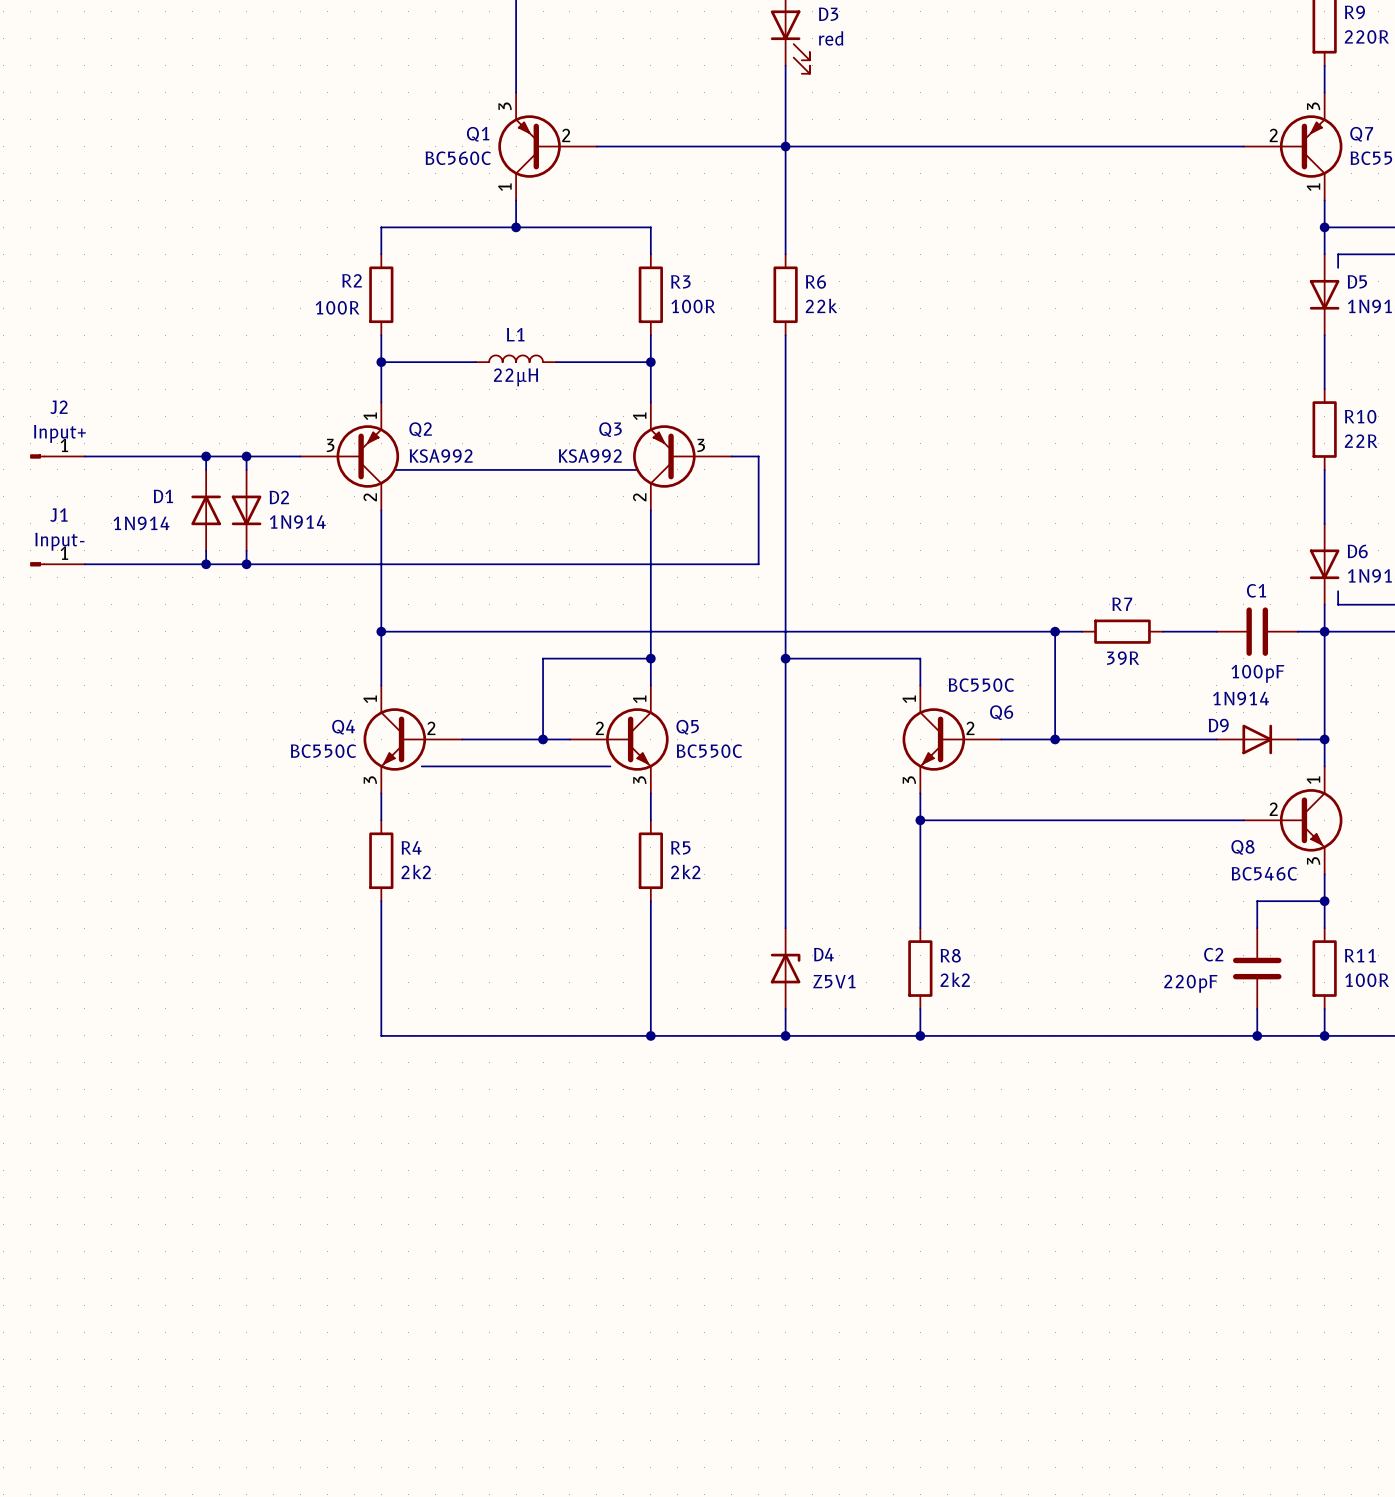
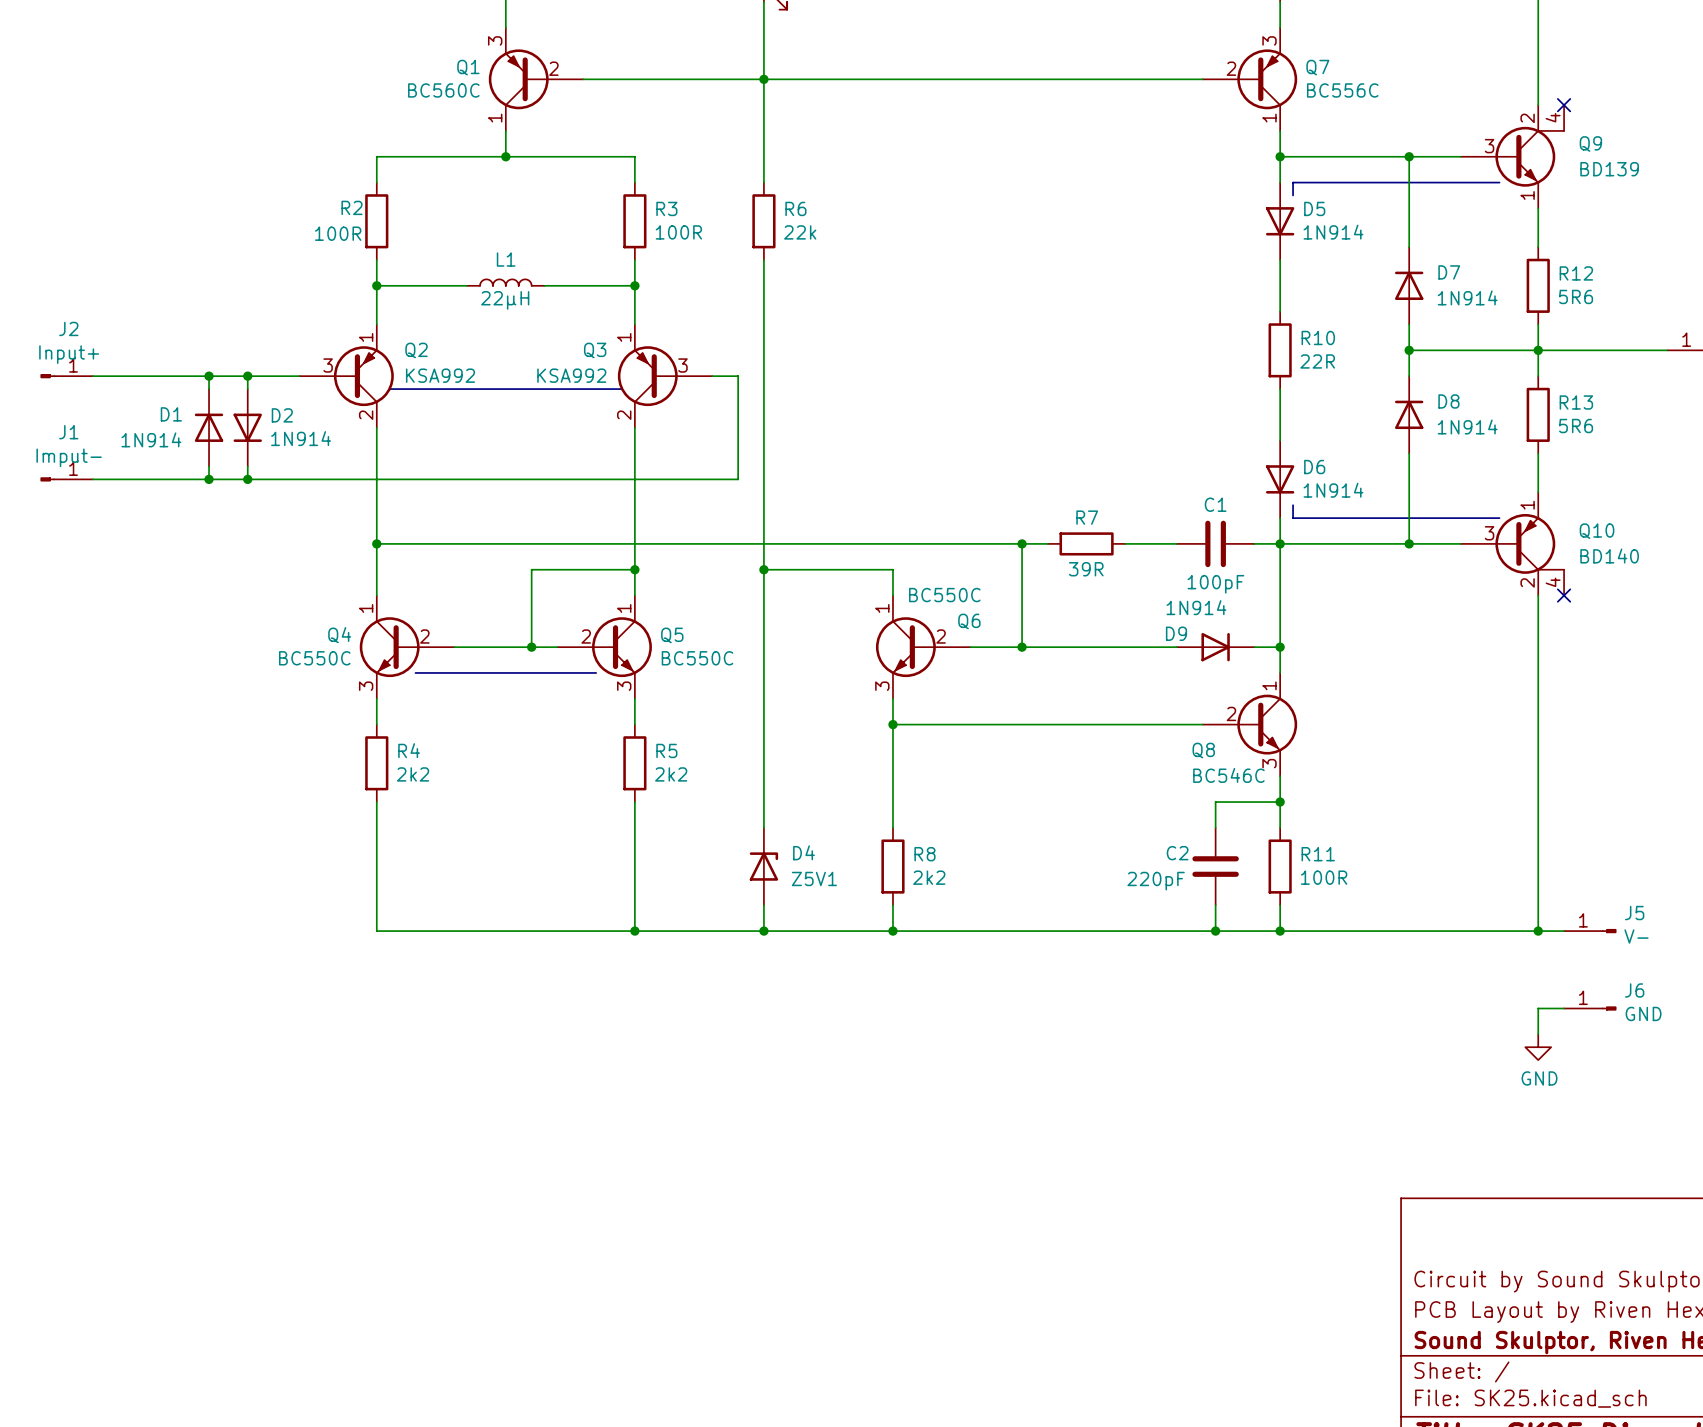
J1 value: Input- (59, 541) -> Imput- (69, 457)

